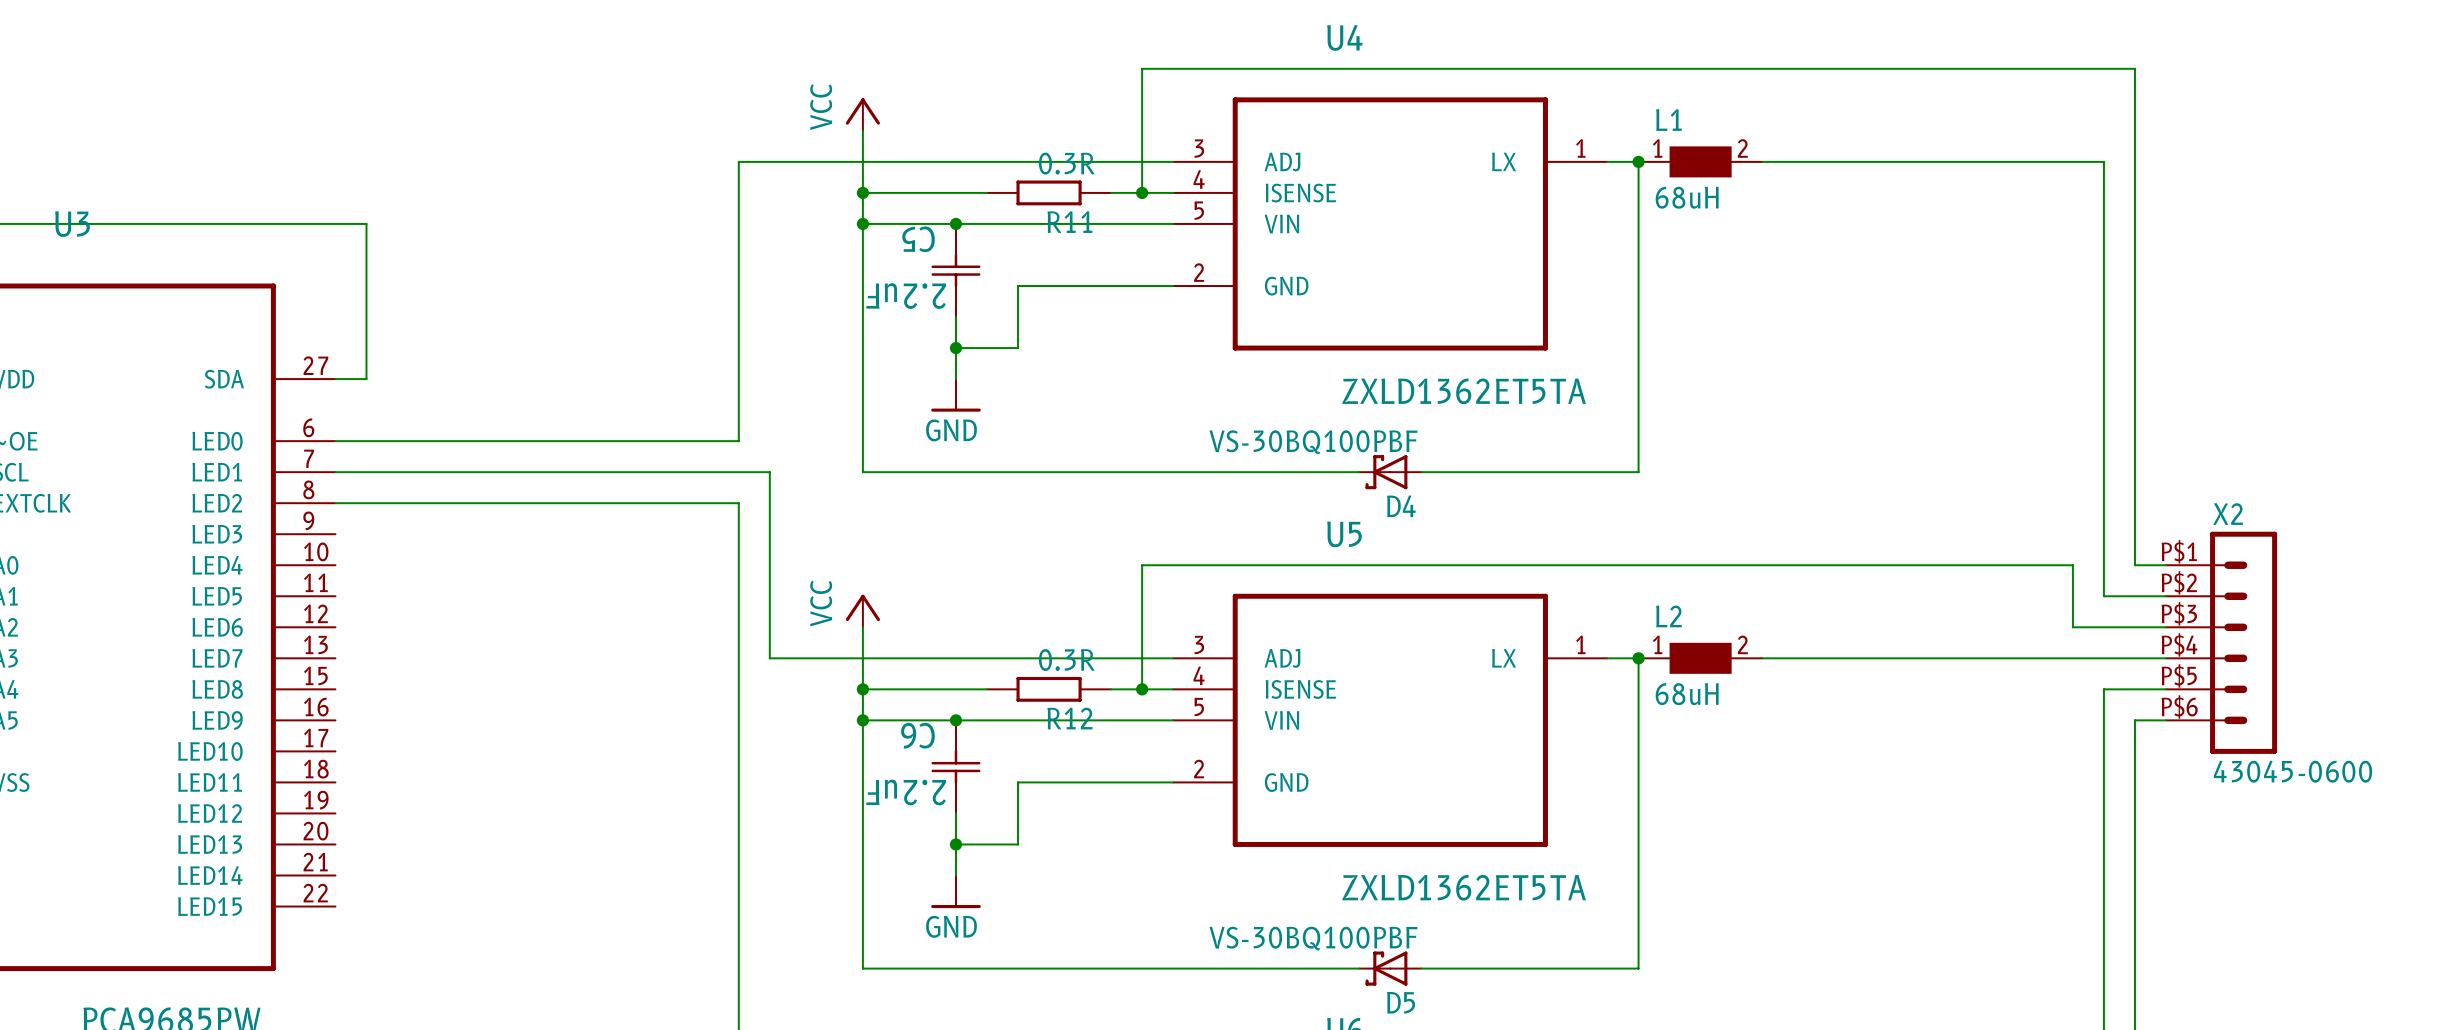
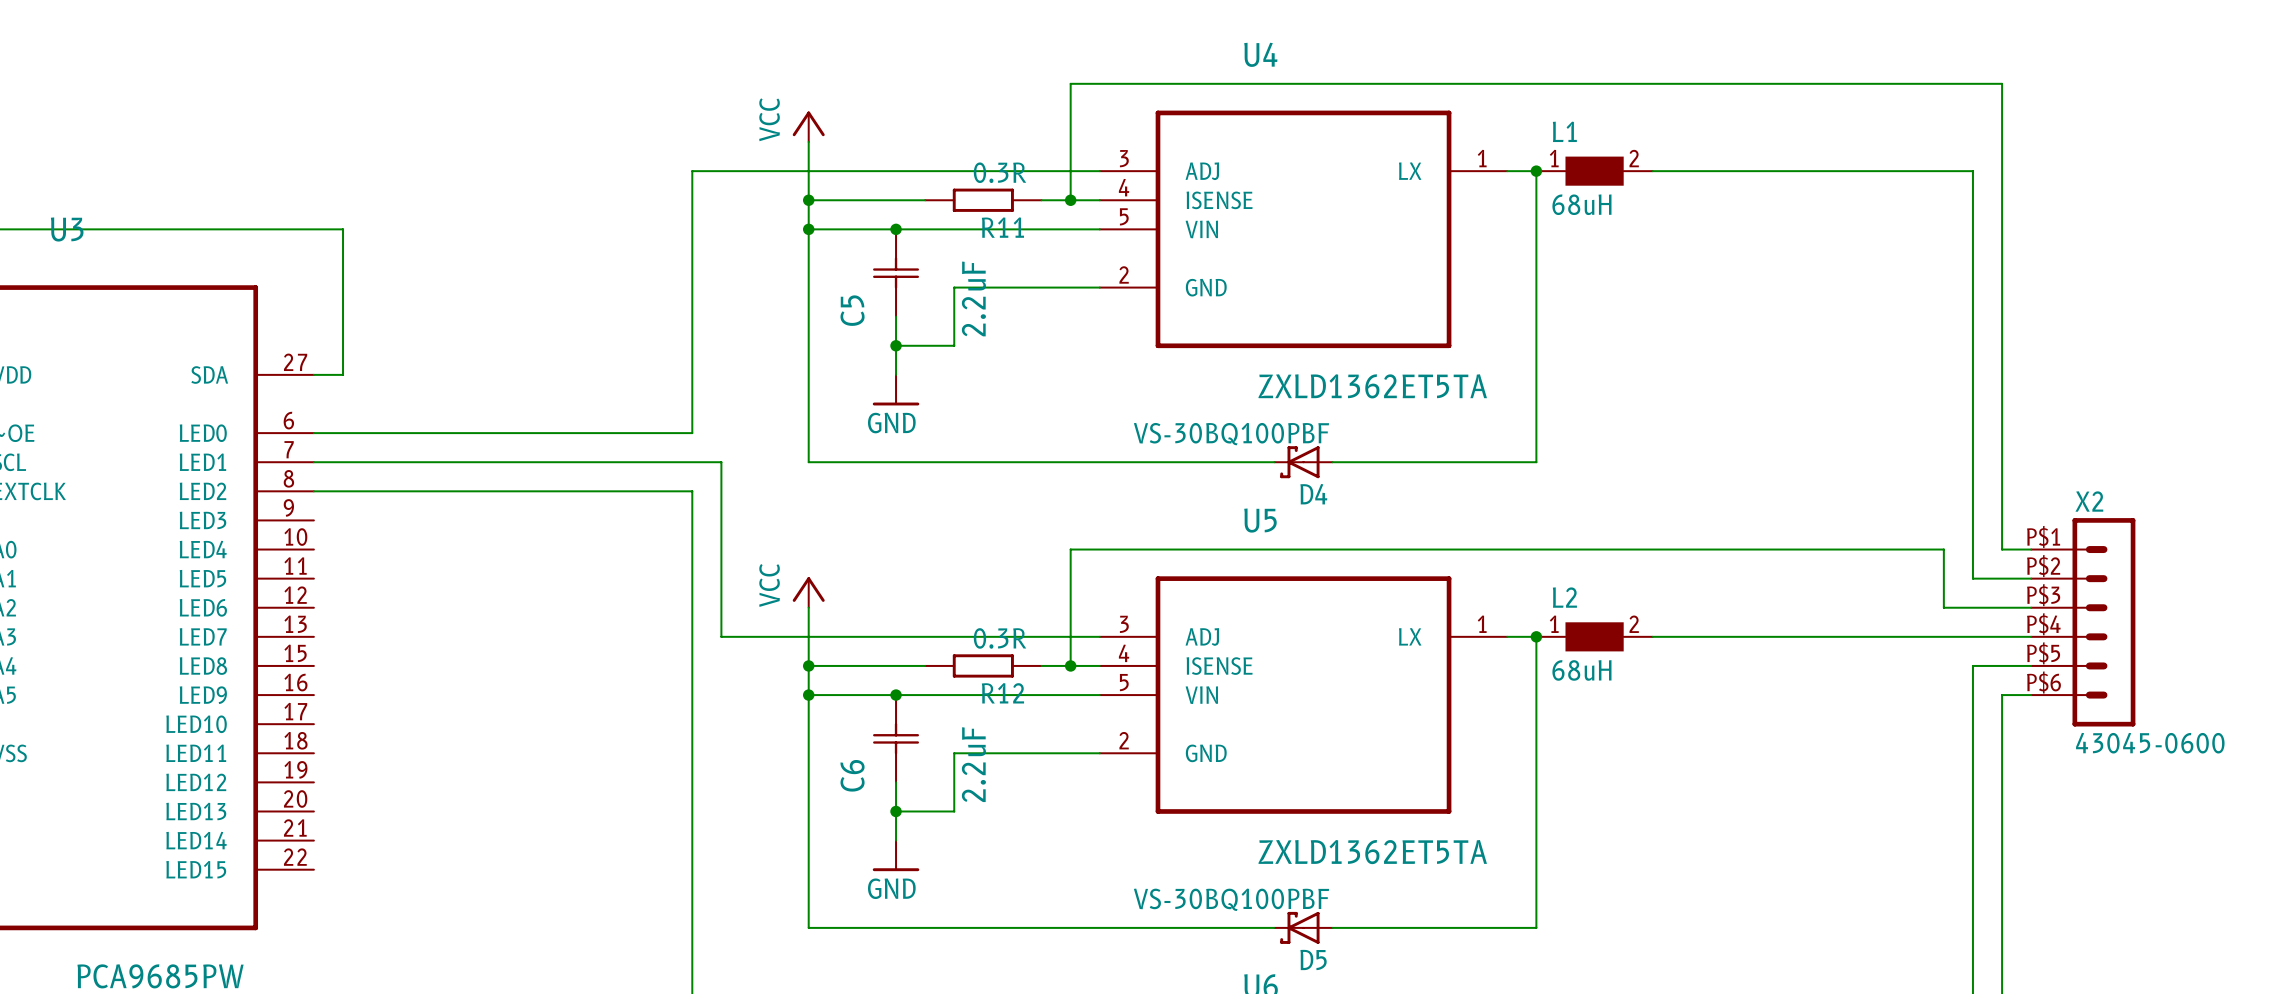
C5 name rotation: 0° (918, 239) -> 90° clockwise (852, 310)
C5 name position: C5 (918, 239) -> C5 (852, 310)
C5 value rotation: 0° (906, 296) -> 90° clockwise (973, 298)
C5 value position: 2.2uF (906, 296) -> 2.2uF (973, 298)
C6 name rotation: 0° (917, 735) -> 90° clockwise (852, 775)
C6 name position: C6 (917, 735) -> C6 (852, 775)
C6 value rotation: 0° (906, 792) -> 90° clockwise (973, 764)
C6 value position: 2.2uF (906, 792) -> 2.2uF (973, 764)

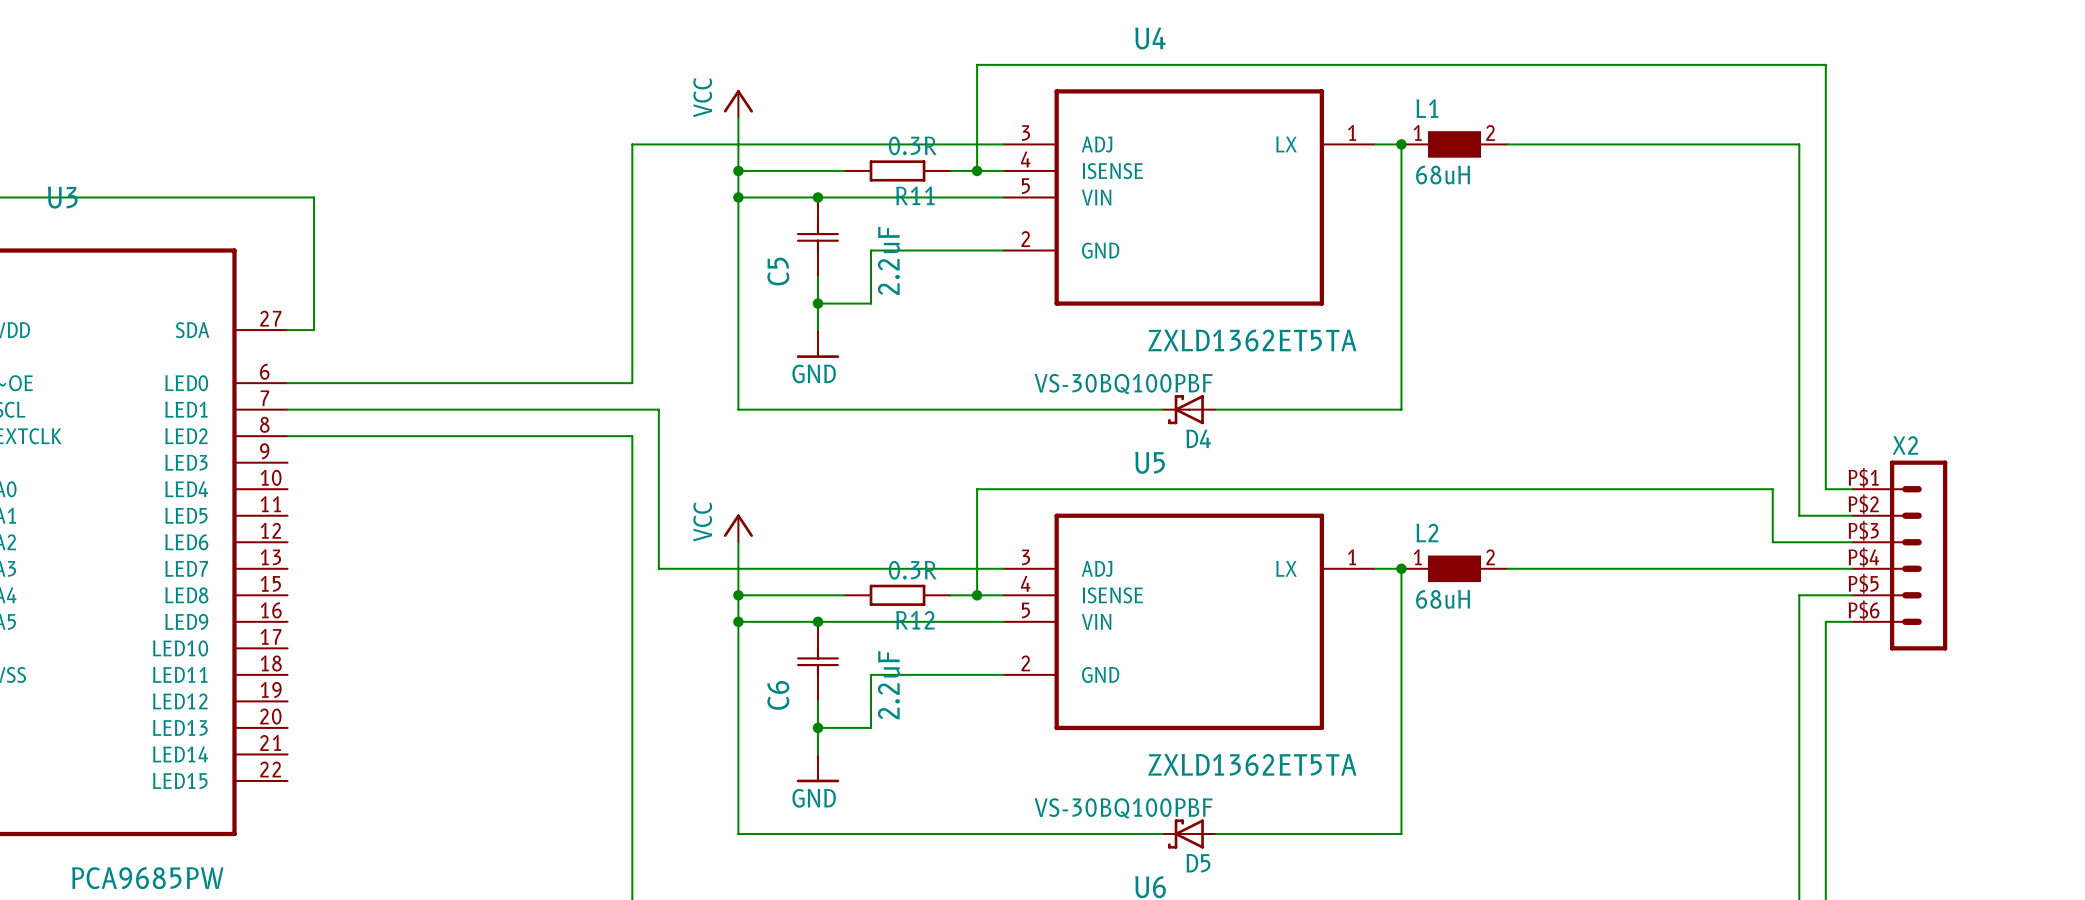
X2 value: 43045-0600 (2150, 743) -> none

